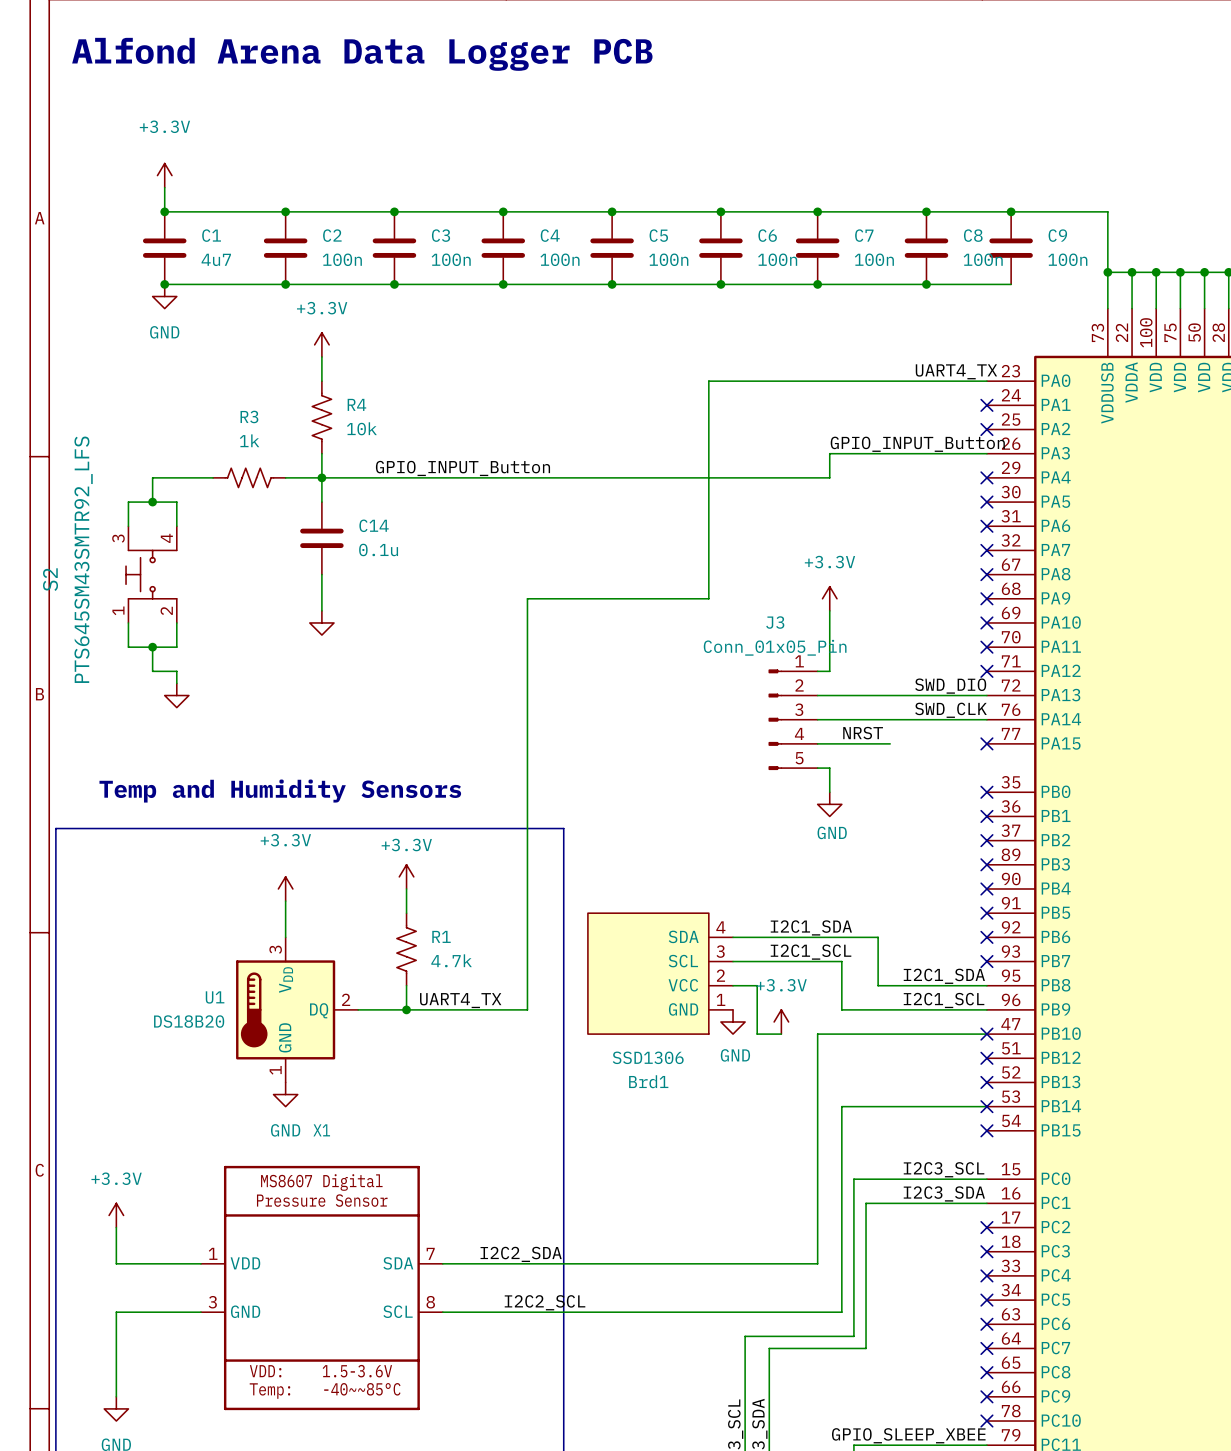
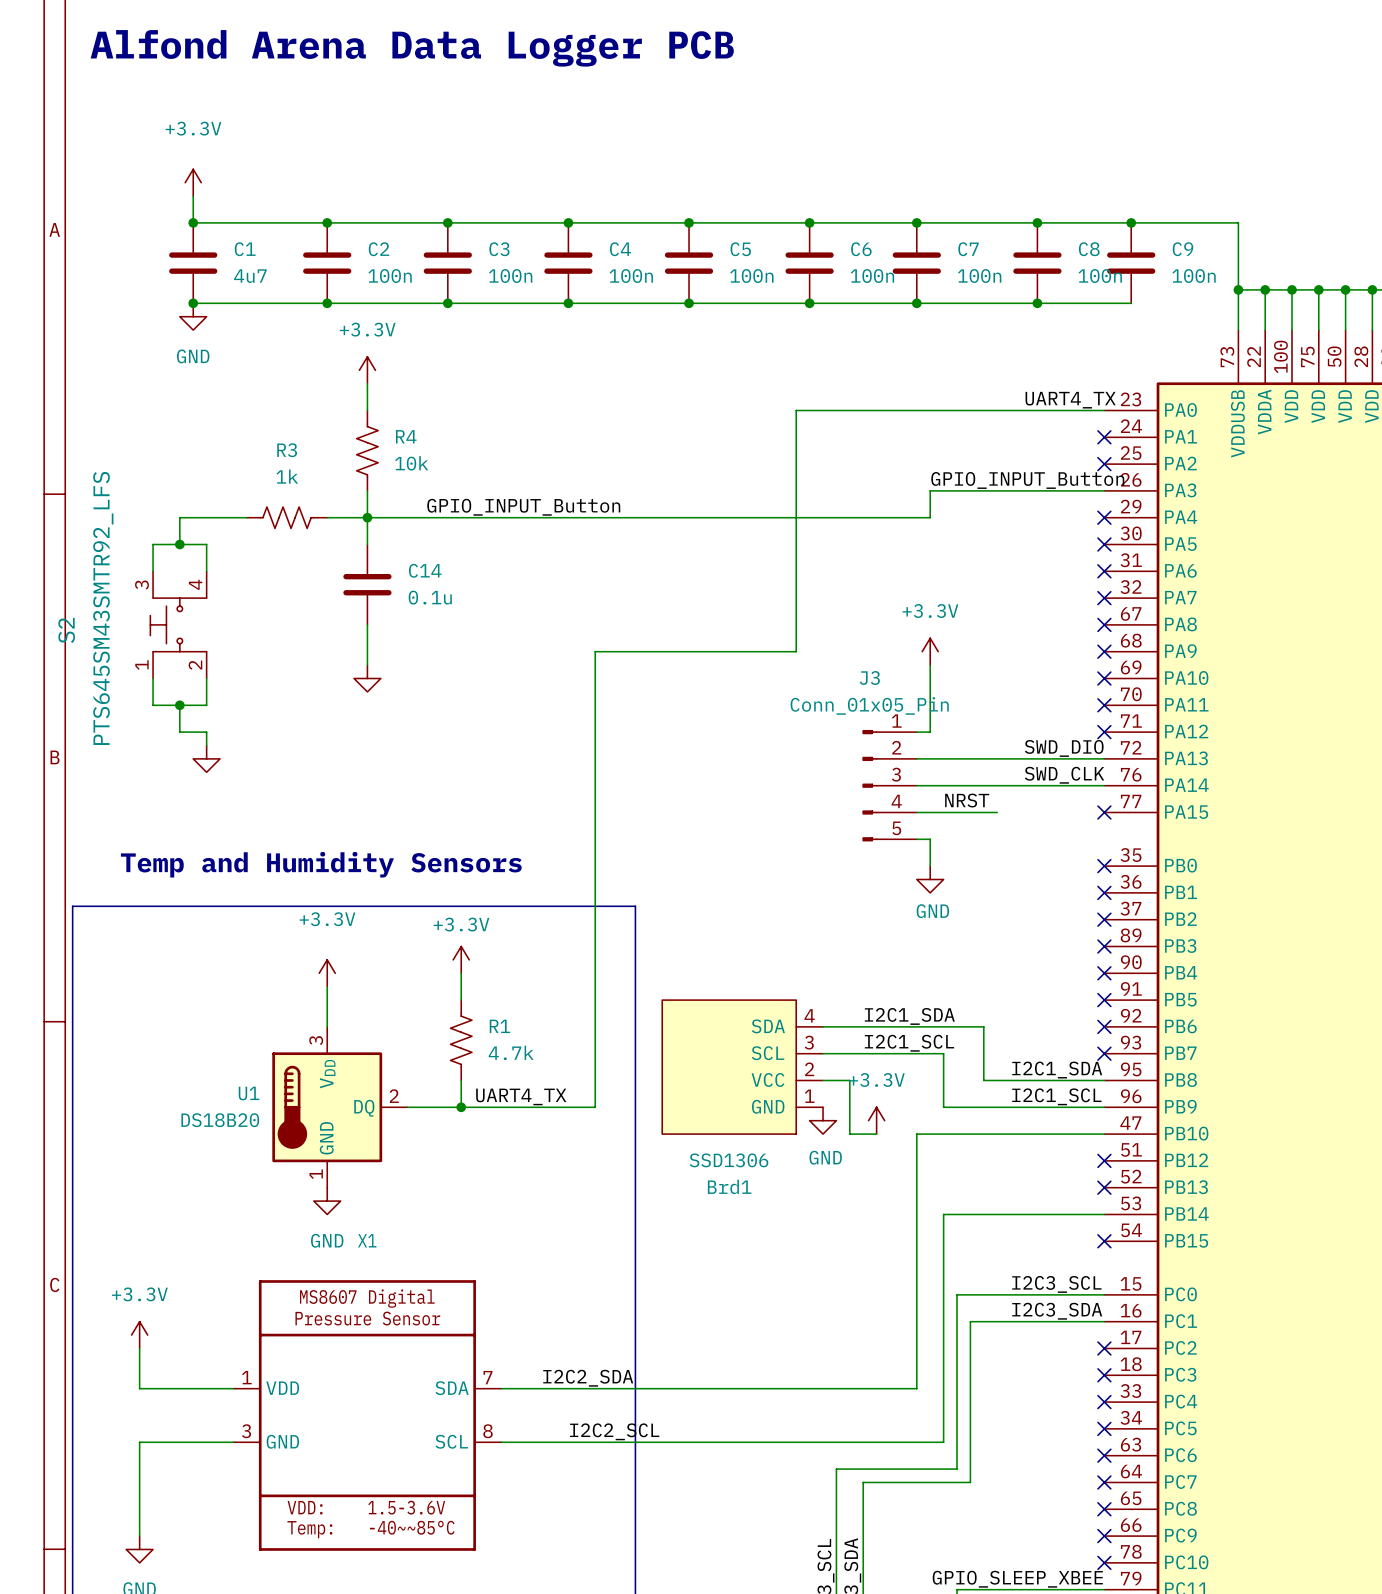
no-connect mark: (986, 1034) -> none
no-connect mark: (986, 1106) -> none

